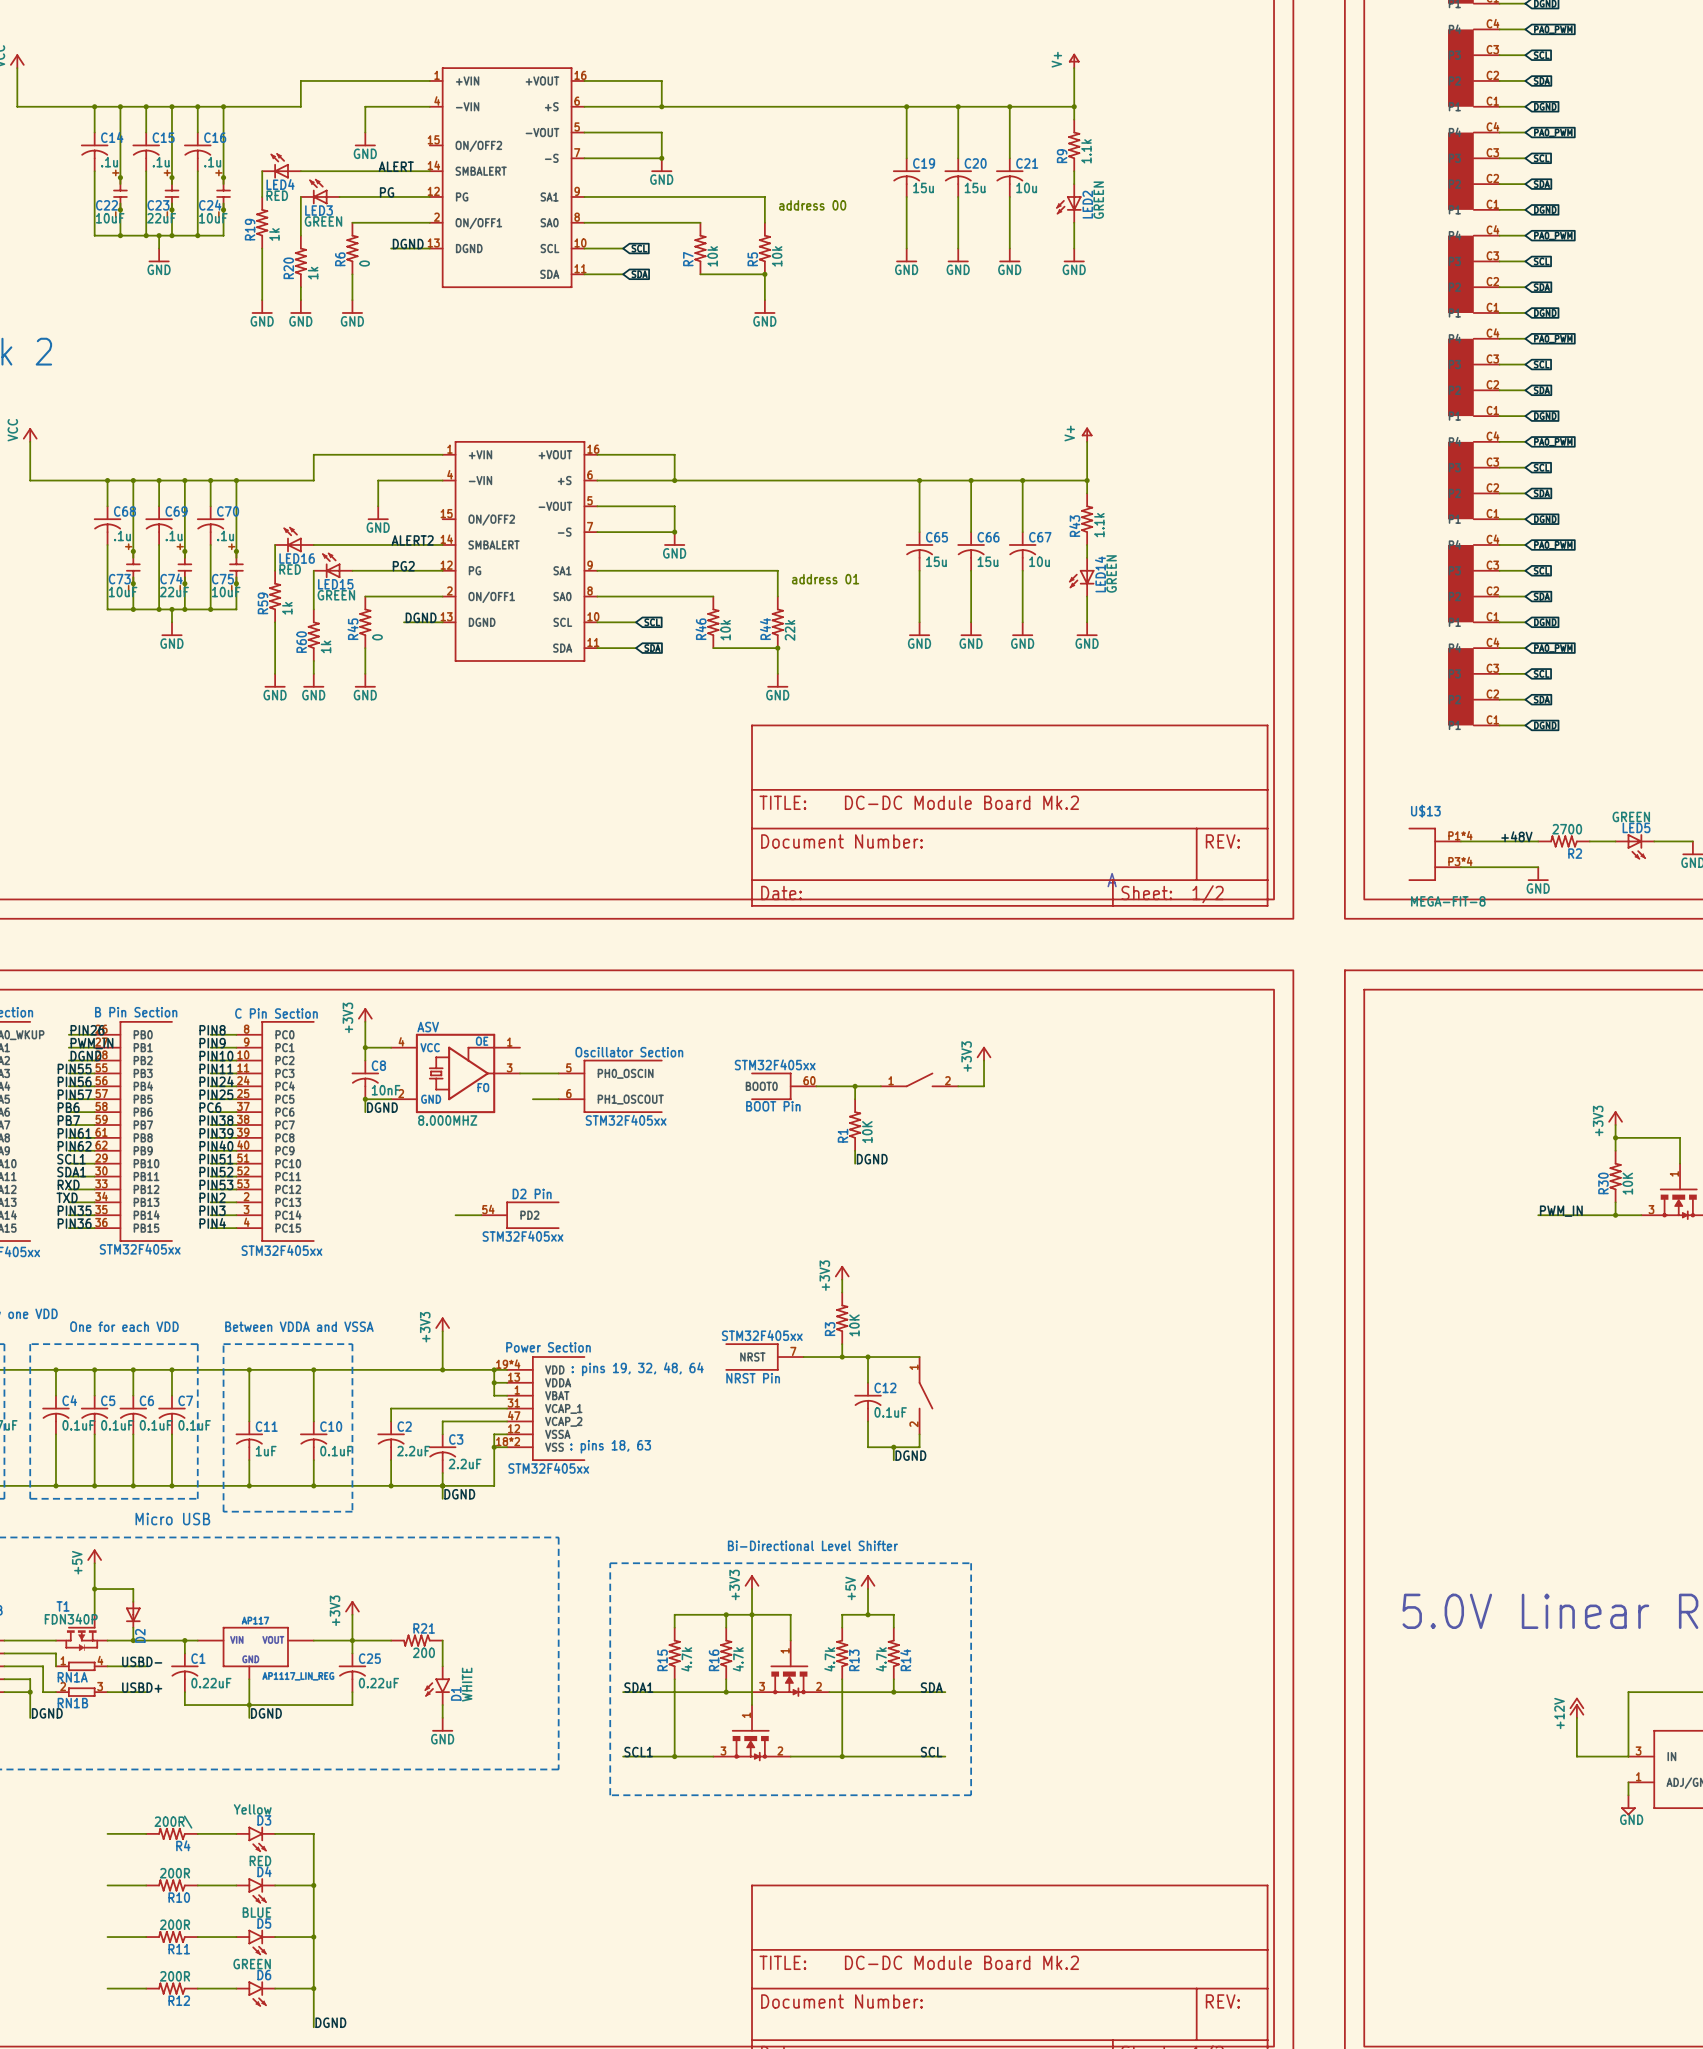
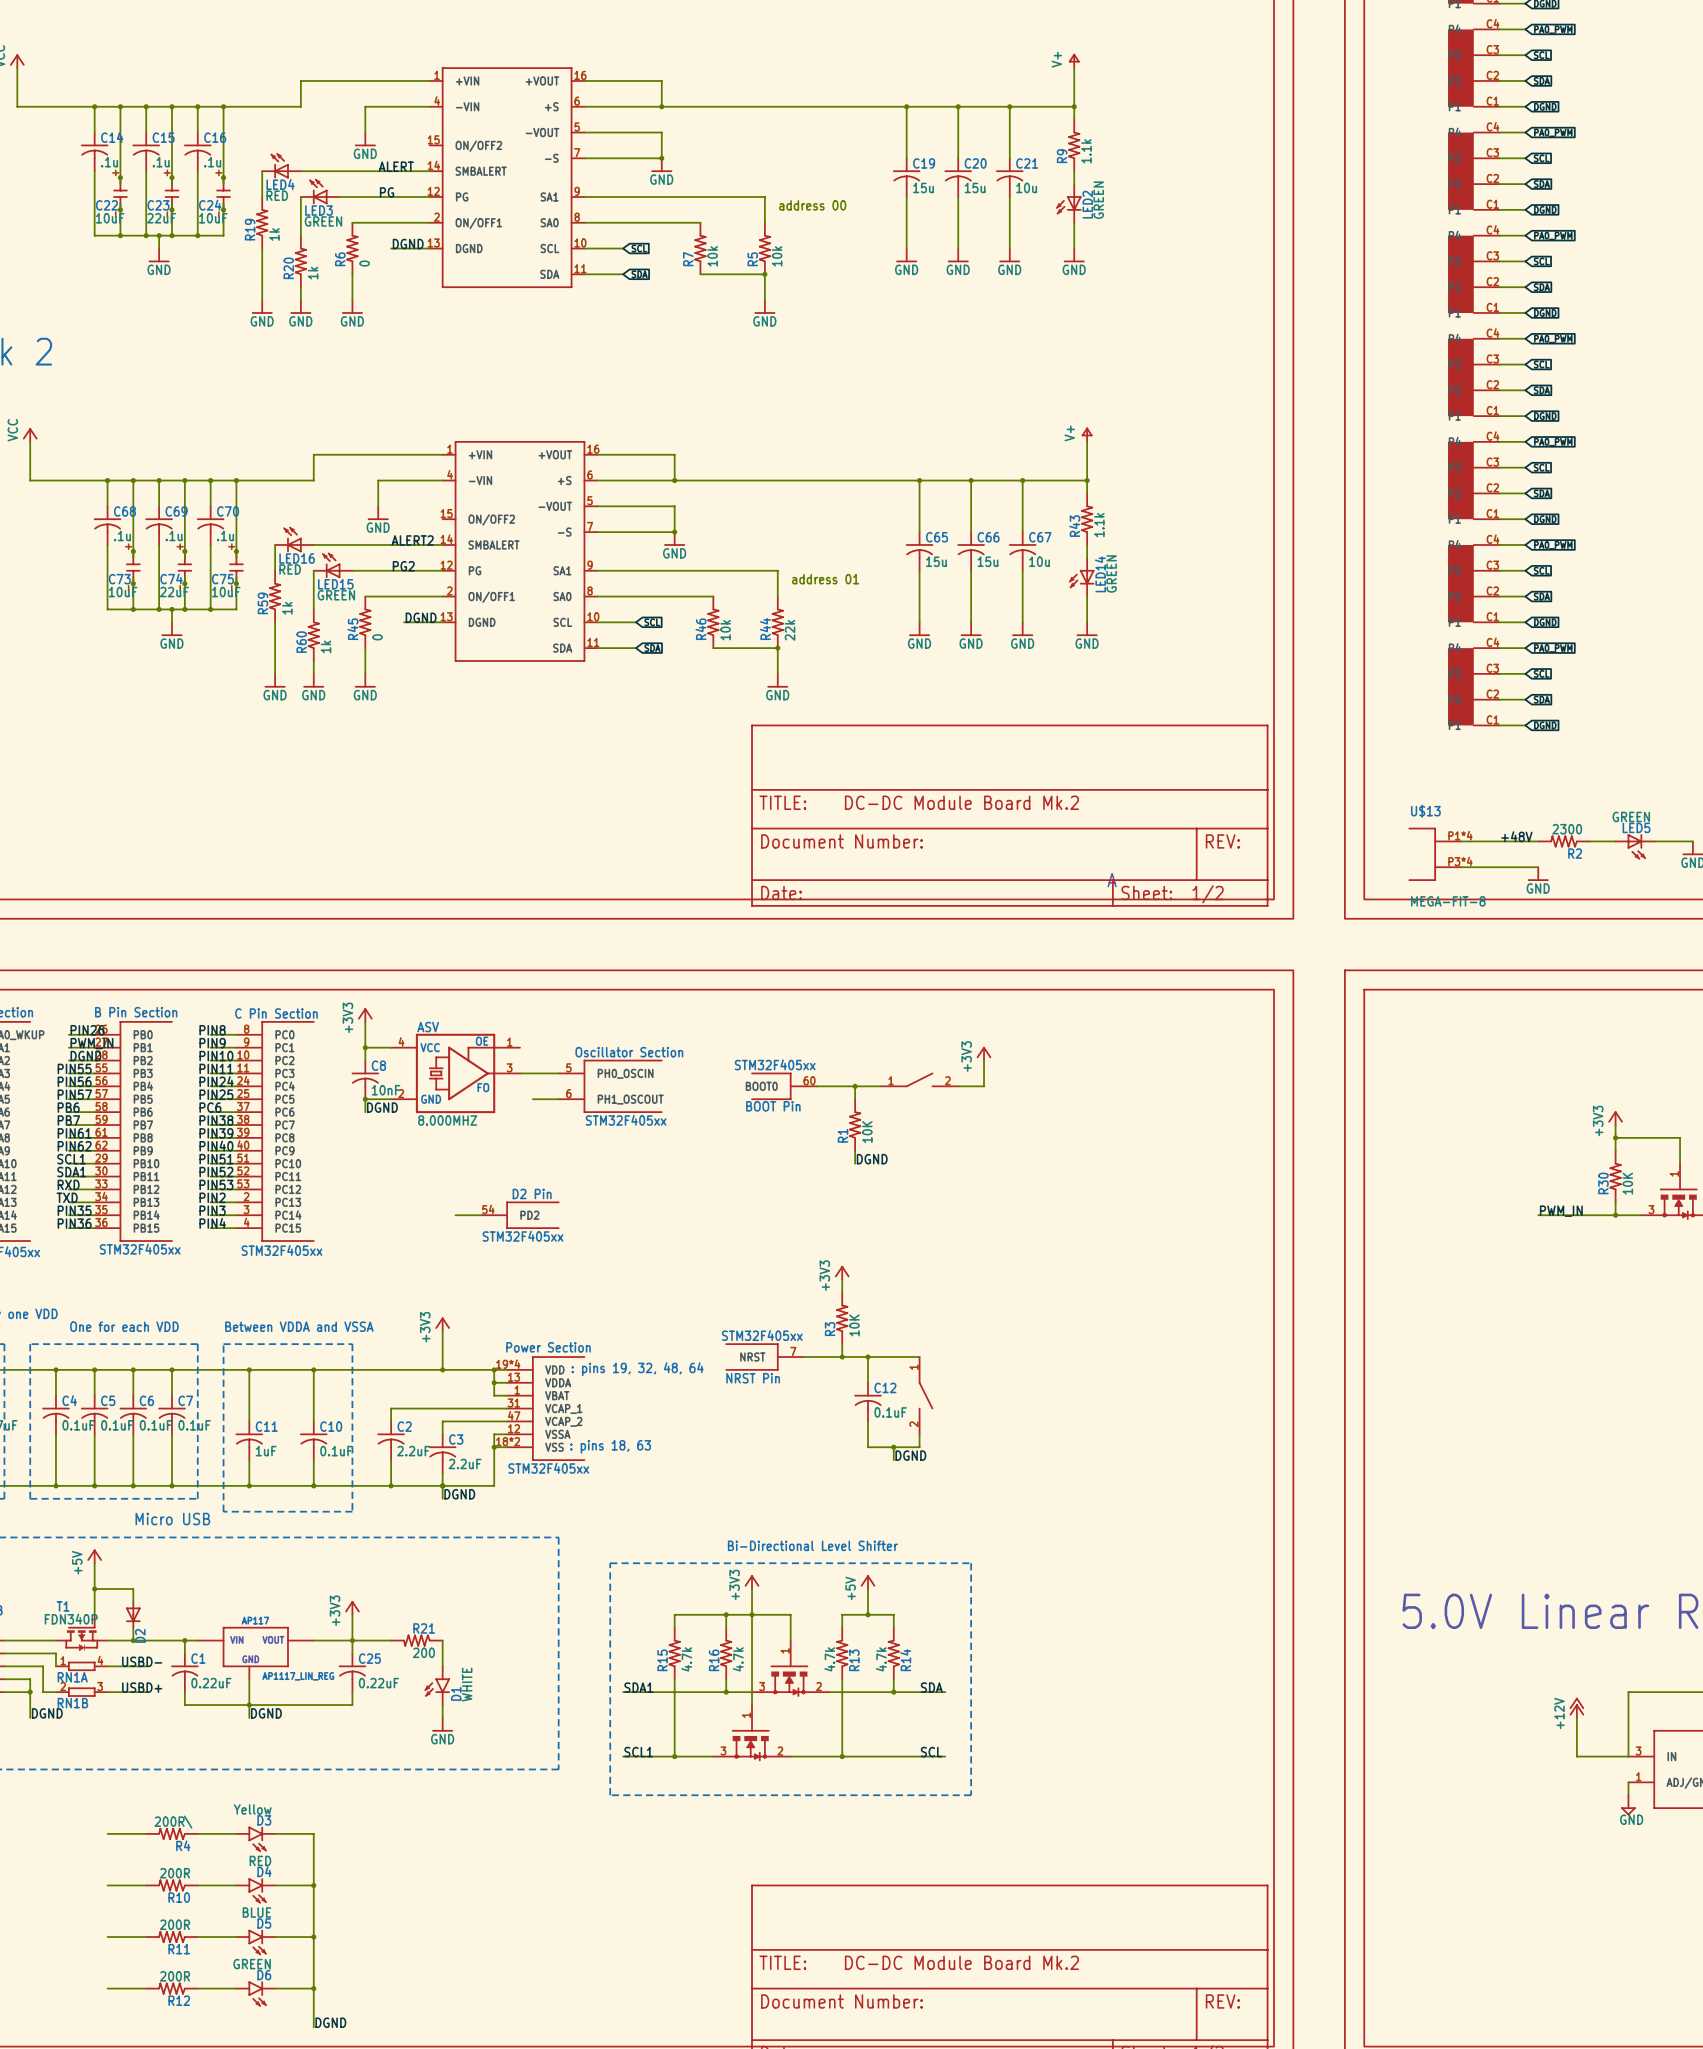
R2 value: 2700 (1567, 829) -> 2300 (1567, 829)

